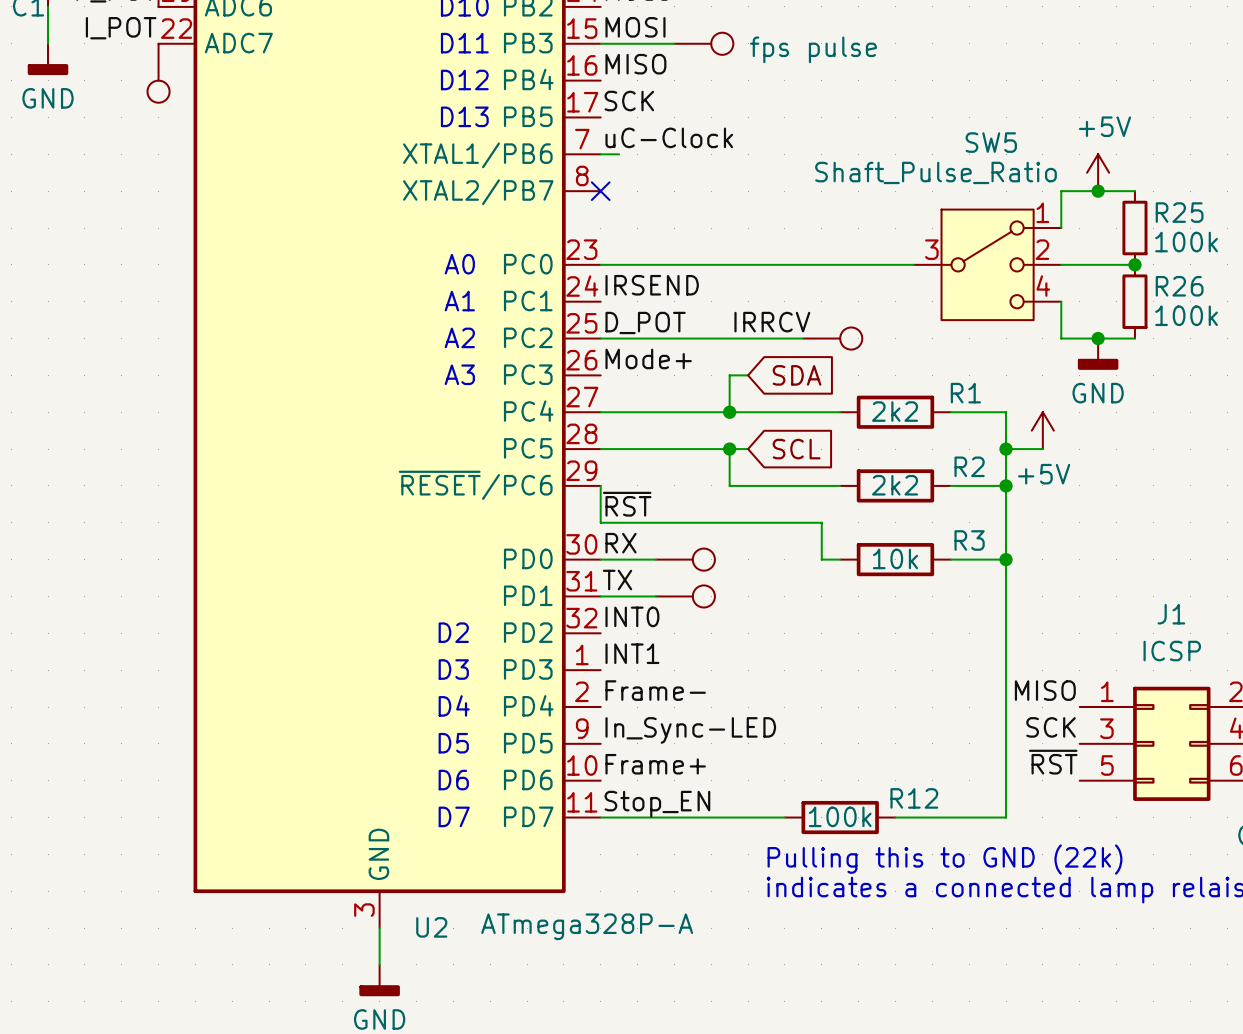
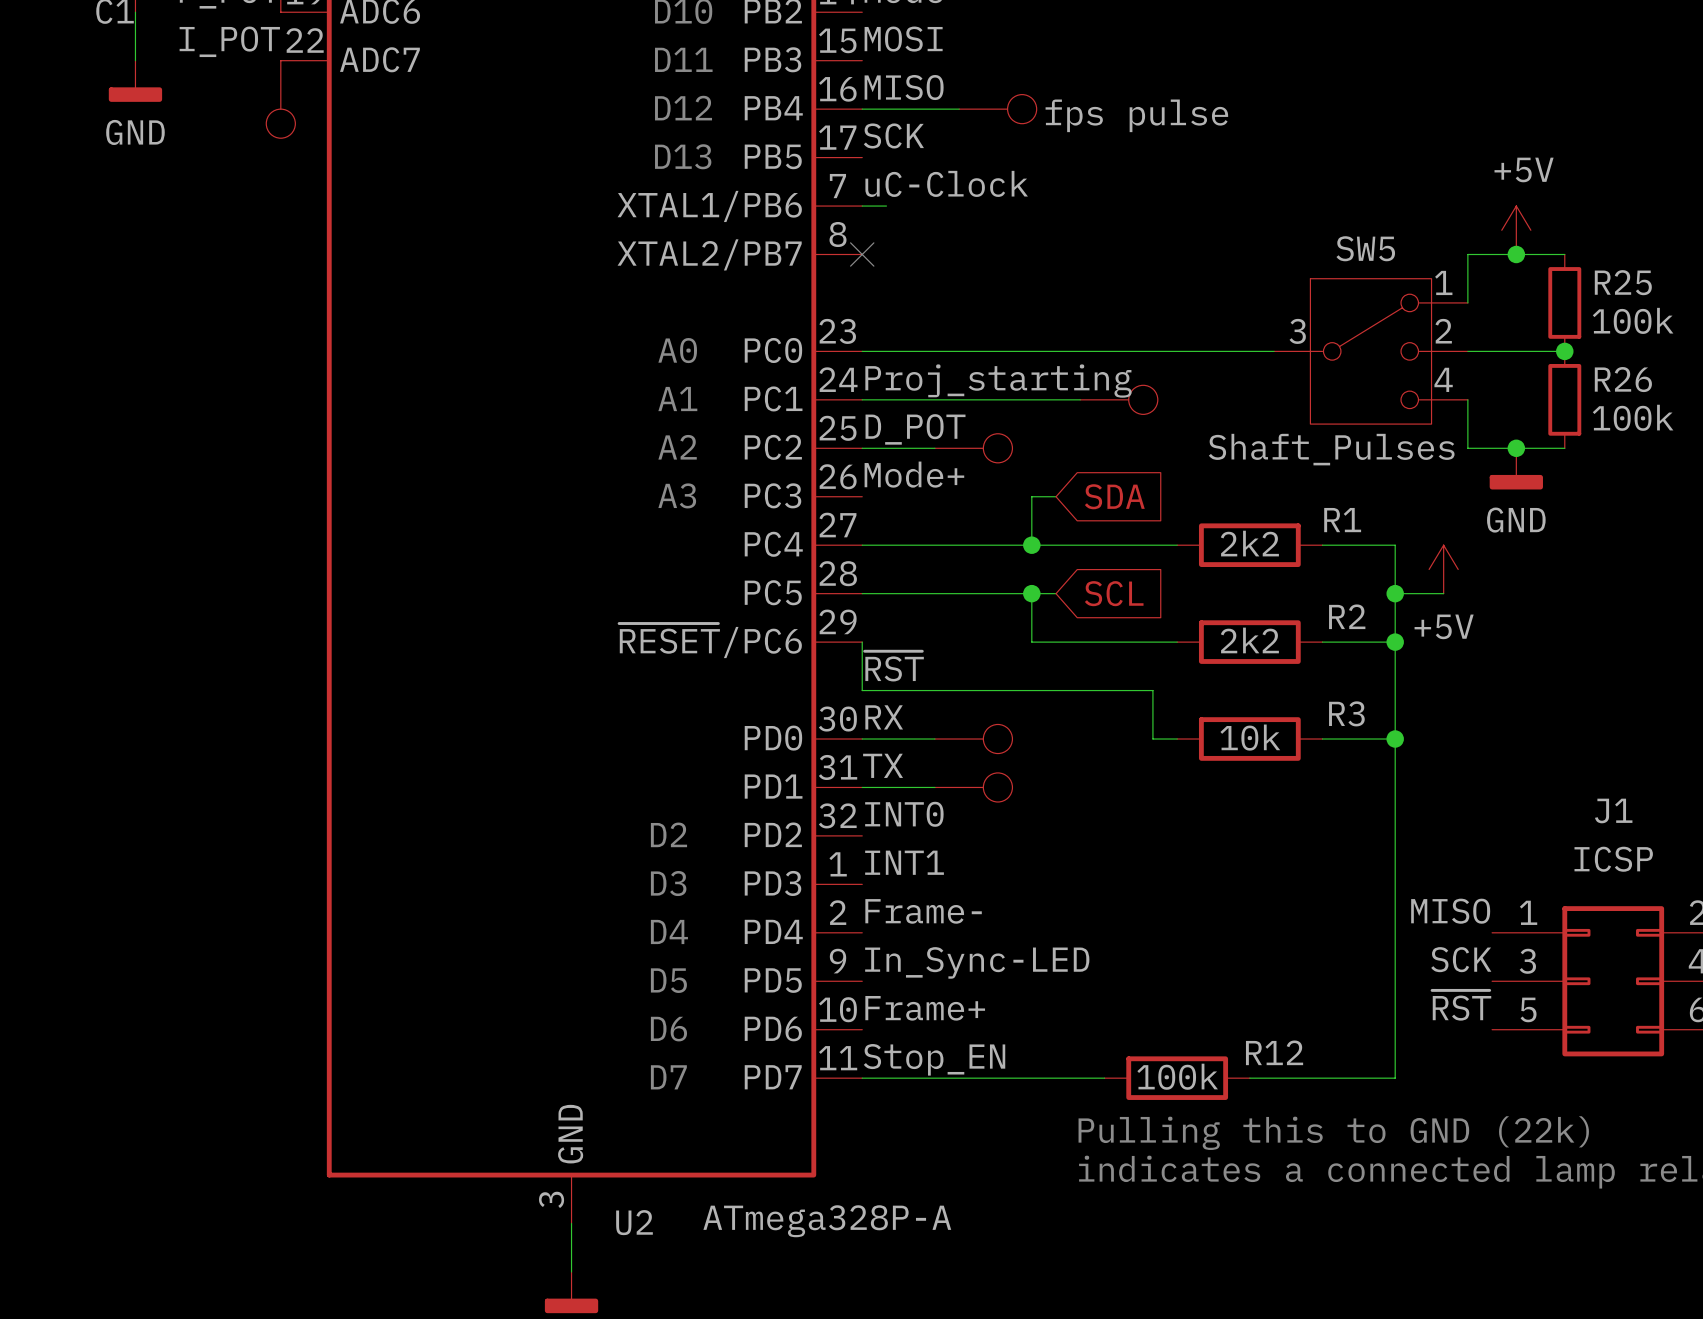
wire: (600, 43) (674, 43) -> (862, 109) (959, 109)
part position: (703, 43) -> (997, 109)
SW5 name position: SW5 (991, 142) -> SW5 (1365, 248)
SW5 value: Shaft_Pulse_Ratio (935, 172) -> Shaft_Pulses (1331, 449)
label: IRSEND (652, 285) -> Proj_starting (998, 381)
wire: none -> (862, 399) (1080, 399)
label: IRRCV (772, 322) -> none
wire: (655, 338) (803, 338) -> none
part: none -> (973, 448)
part position: (832, 338) -> (1119, 399)

